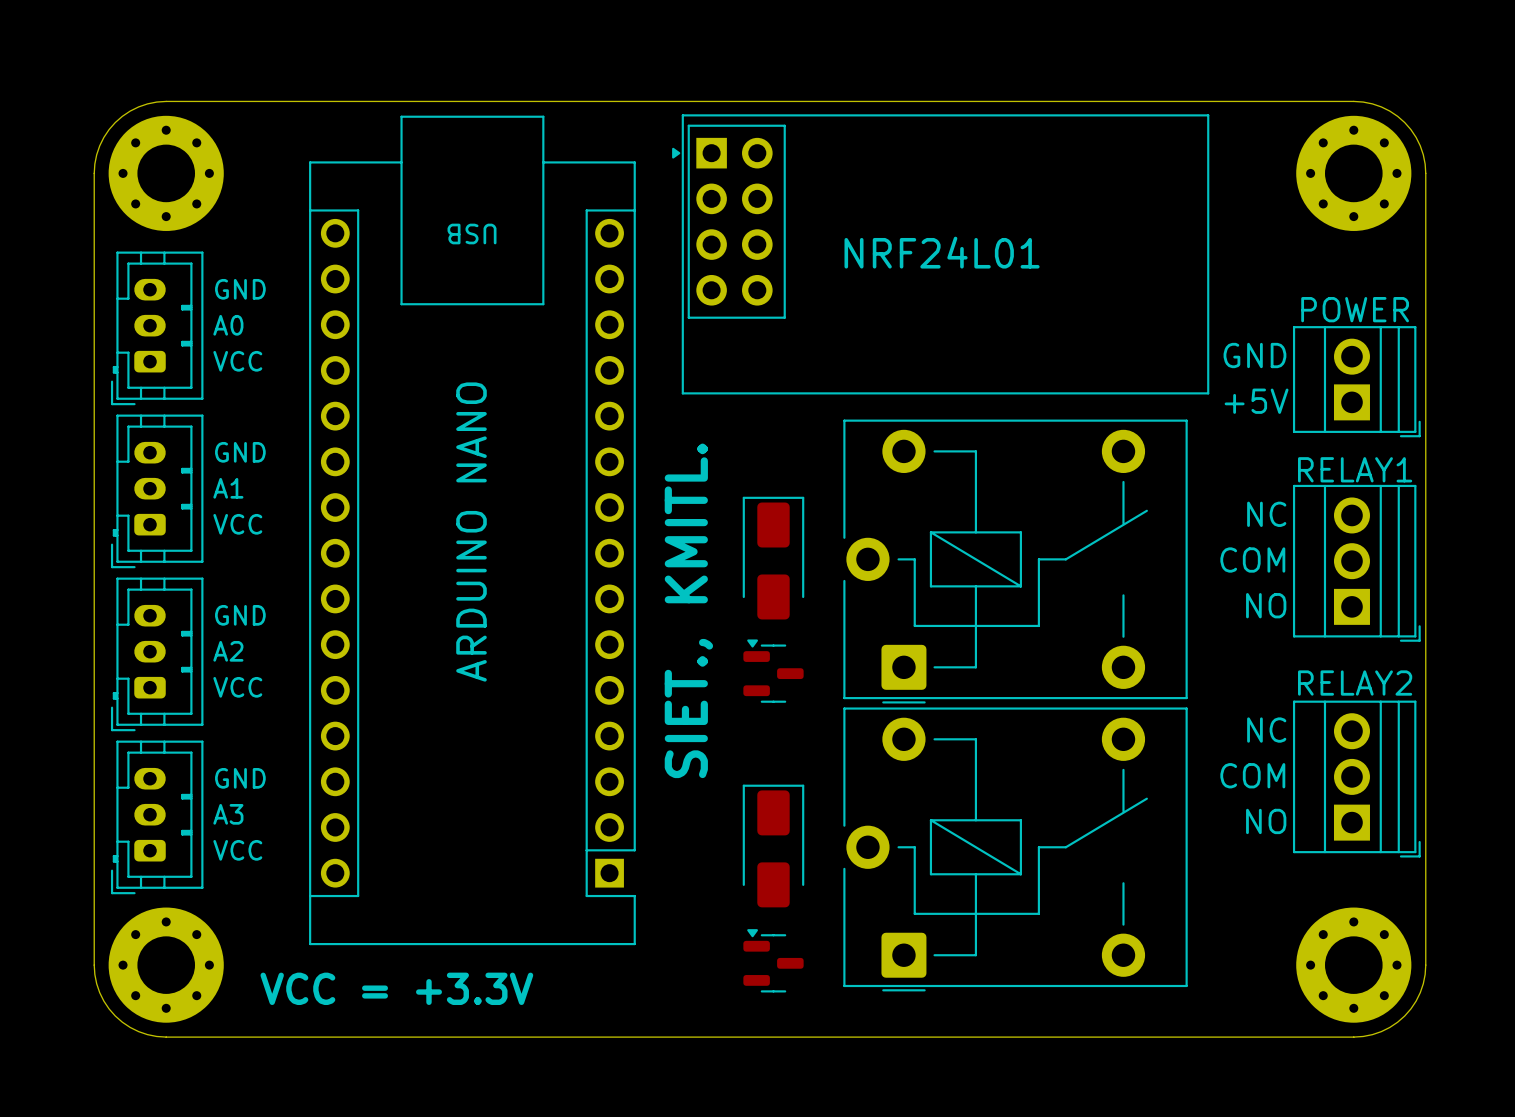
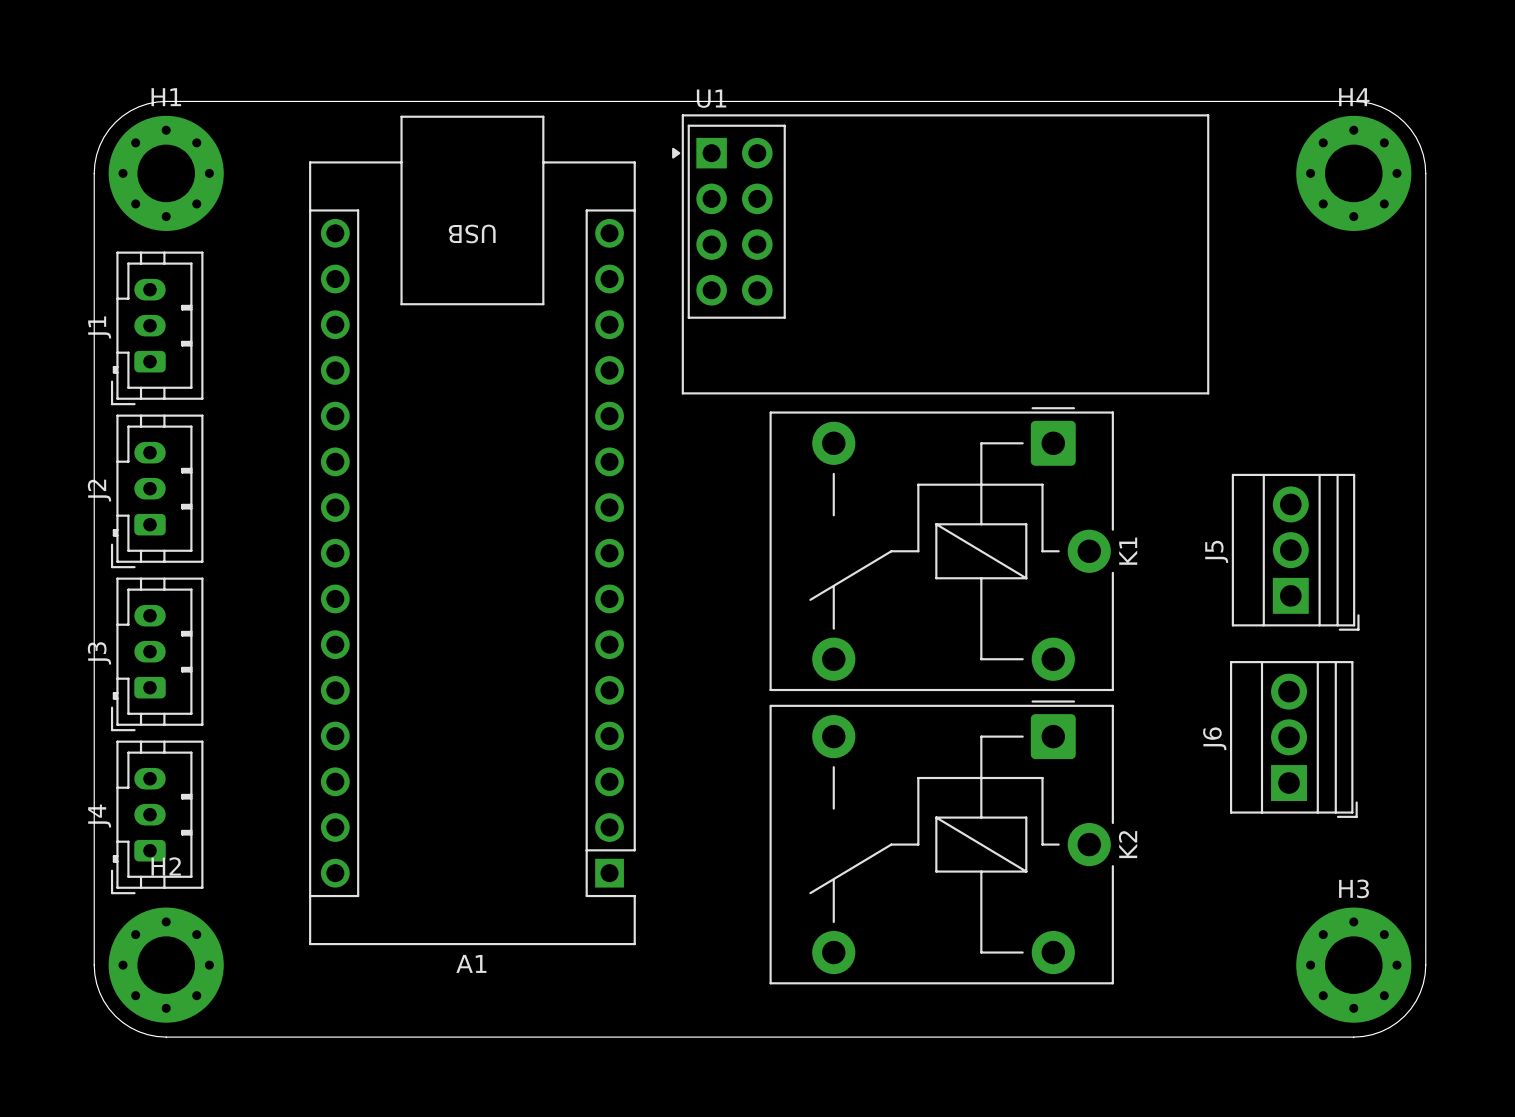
H4 name: none -> H4 (1354, 97)
H1 name: none -> H1 (166, 97)
U1 name: none -> U1 (711, 98)
text: NRF24L01 (942, 252) -> none
text: GND (240, 289) -> none
text: POWER (1355, 309) -> none
text: A0 (228, 325) -> none
J1 name: none -> J1 (99, 327)
text: GND (1254, 355) -> none
text: VCC (237, 361) -> none
part: (1356, 381) -> none
text: +5V (1256, 401) -> none
text: GND (240, 452) -> none
text: RELAY1 (1355, 469) -> none
text: A1 (228, 488) -> none
J2 name: none -> J2 (99, 490)
text: NC (1266, 514) -> none
text: VCC (237, 524) -> none
text: ARDUINO NANO (471, 532) -> none
K1: none -> (941, 549)
J5: none -> (1295, 552)
part: (773, 558) -> none
text: COM (1252, 560) -> none
part: (1015, 561) -> none
part: (1356, 563) -> none
text: NO (1266, 605) -> none
text: SIET., KMITL. (688, 610) -> none
text: GND (240, 615) -> none
text: A2 (228, 651) -> none
J3 name: none -> J3 (99, 653)
part: (773, 671) -> none
text: RELAY2 (1355, 683) -> none
text: VCC (237, 687) -> none
text: NC (1266, 730) -> none
J6: none -> (1293, 739)
text: COM (1252, 775) -> none
text: GND (240, 778) -> none
part: (1356, 779) -> none
J4 name: none -> J4 (99, 816)
text: A3 (228, 814) -> none
text: NO (1266, 821) -> none
K2: none -> (941, 842)
part: (773, 846) -> none
part: (1015, 849) -> none
text: VCC (237, 850) -> none
H2 name: none -> H2 (166, 866)
H3 name: none -> H3 (1354, 888)
part: (773, 960) -> none
A1 name: none -> A1 (471, 963)
text: VCC = +3.3V (396, 988) -> none

